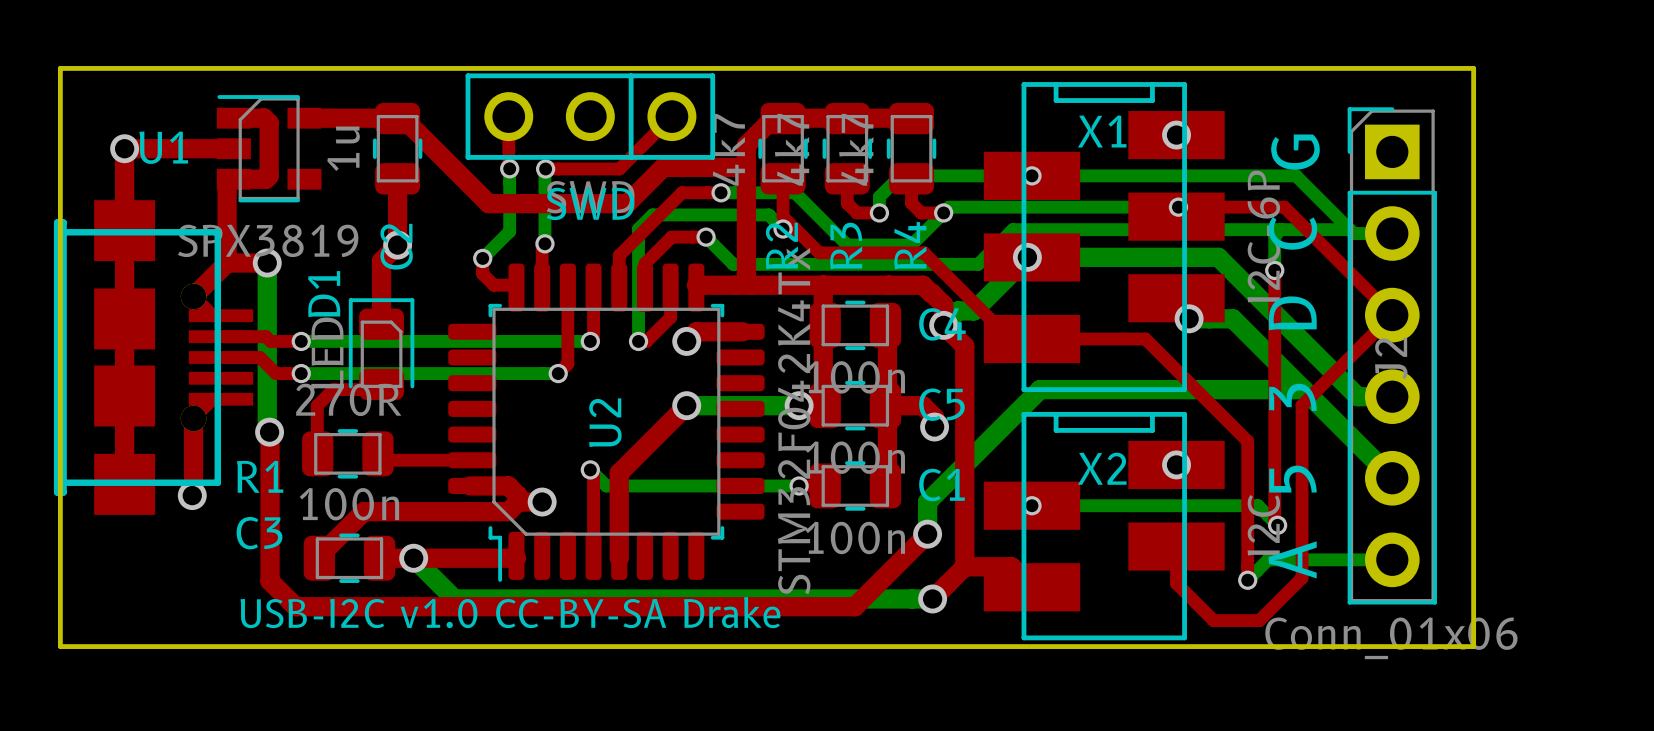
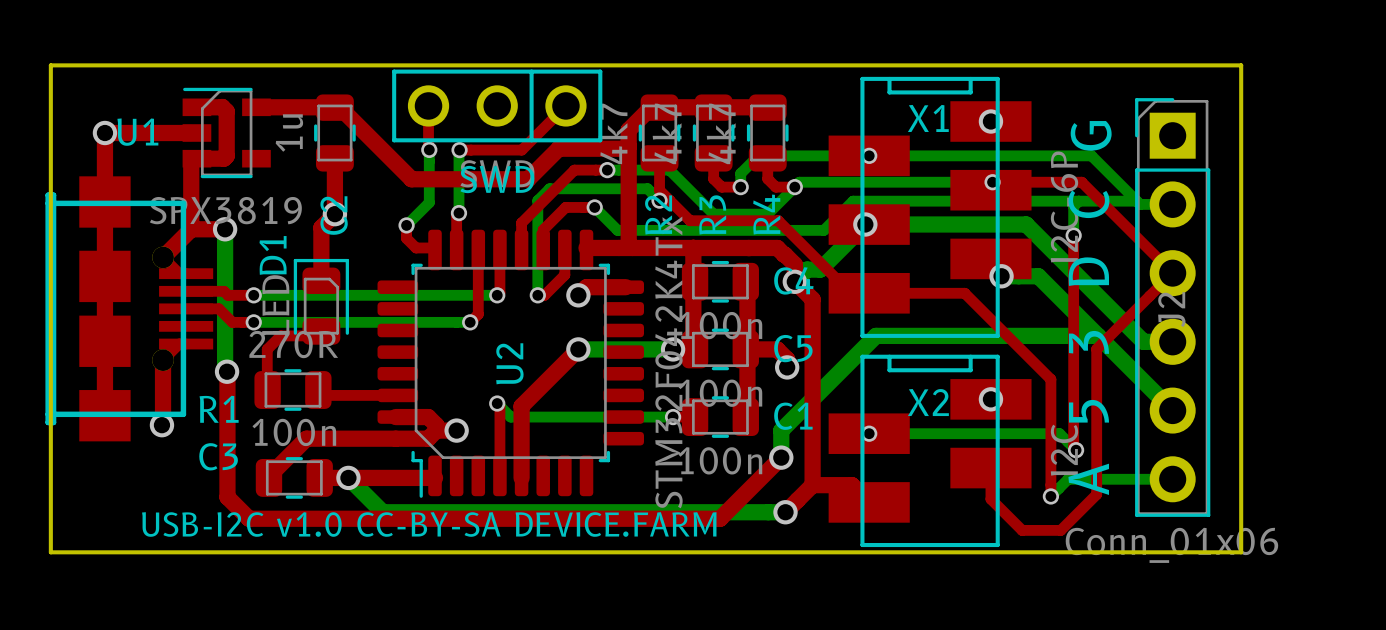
text: USB-I2C v1.0 CC-BY-SA Drake (510, 612) -> USB-I2C v1.0 CC-BY-SA DEVICE.FARM (429, 524)

